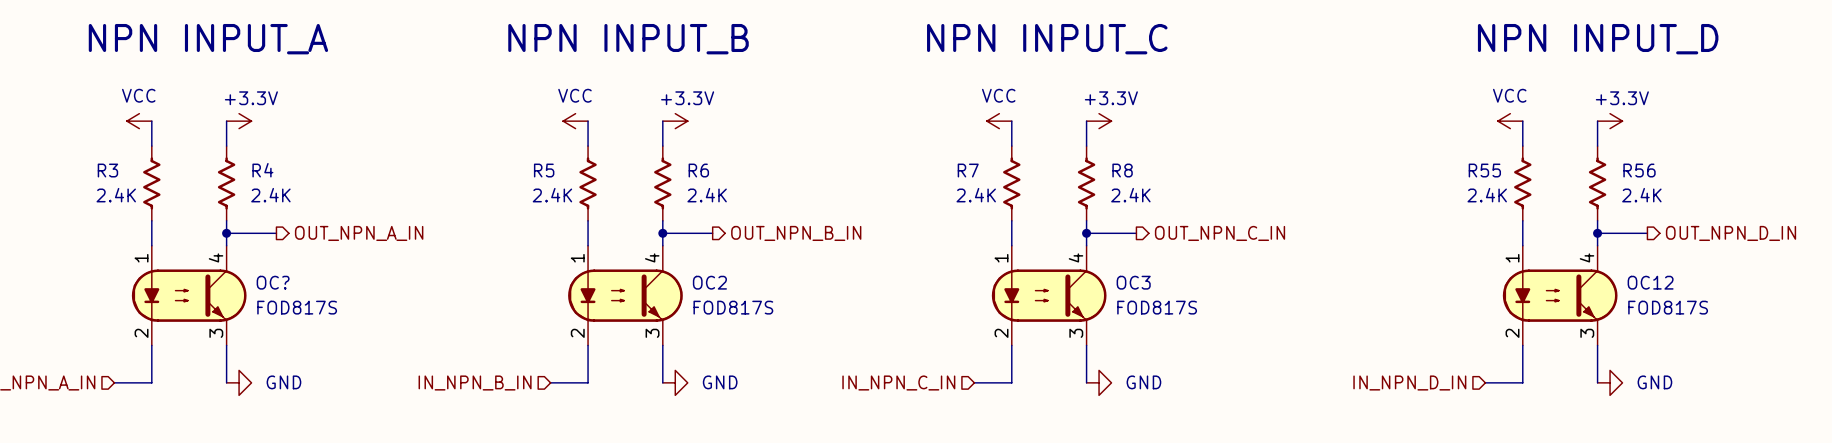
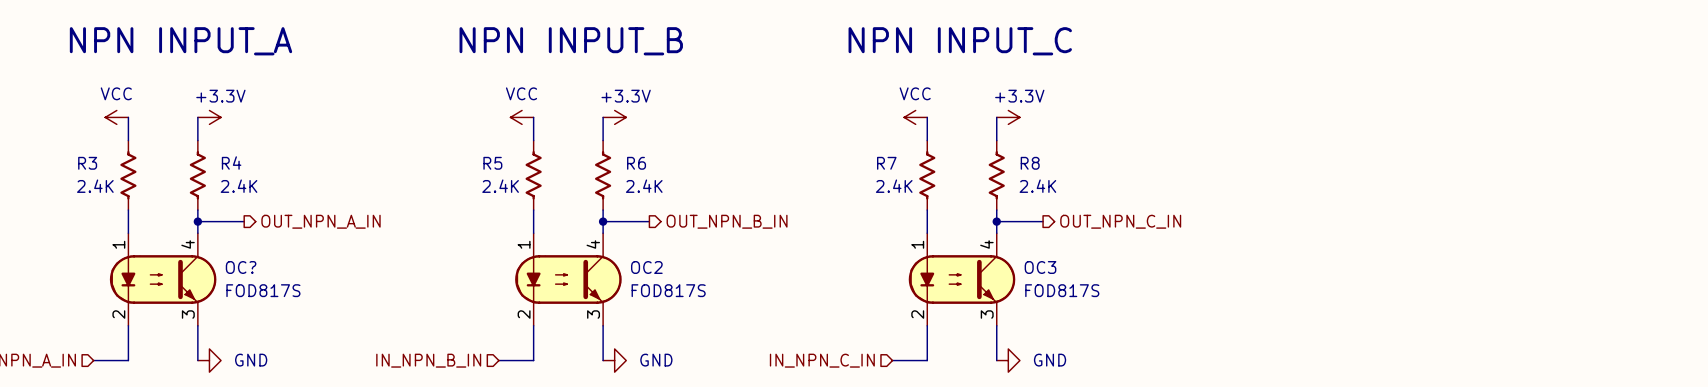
text: NPN INPUT_D (1598, 39) -> none
power symbol: VCC (1510, 121) -> none
wire: (1522, 121) (1522, 146) -> none
wire: (1597, 121) (1597, 146) -> none
power symbol: +3.3V (1610, 121) -> none
R55: 2.4K (1522, 183) -> none
R56: 2.4K (1597, 183) -> none
wire: (1522, 220) (1522, 245) -> none
wire: (1597, 220) (1597, 245) -> none
wire: (1597, 233) (1647, 233) -> none
junction: (1597, 233) -> none
hierarchical label: OUT_NPN_D_IN (1731, 233) -> none
OC12: FOD817S (1560, 295) -> none
wire: (1522, 345) (1522, 382) (1485, 382) -> none
wire: (1597, 345) (1597, 382) -> none
power symbol: GND (1610, 382) -> none
hierarchical label: IN_NPN_D_IN (1409, 383) -> none

